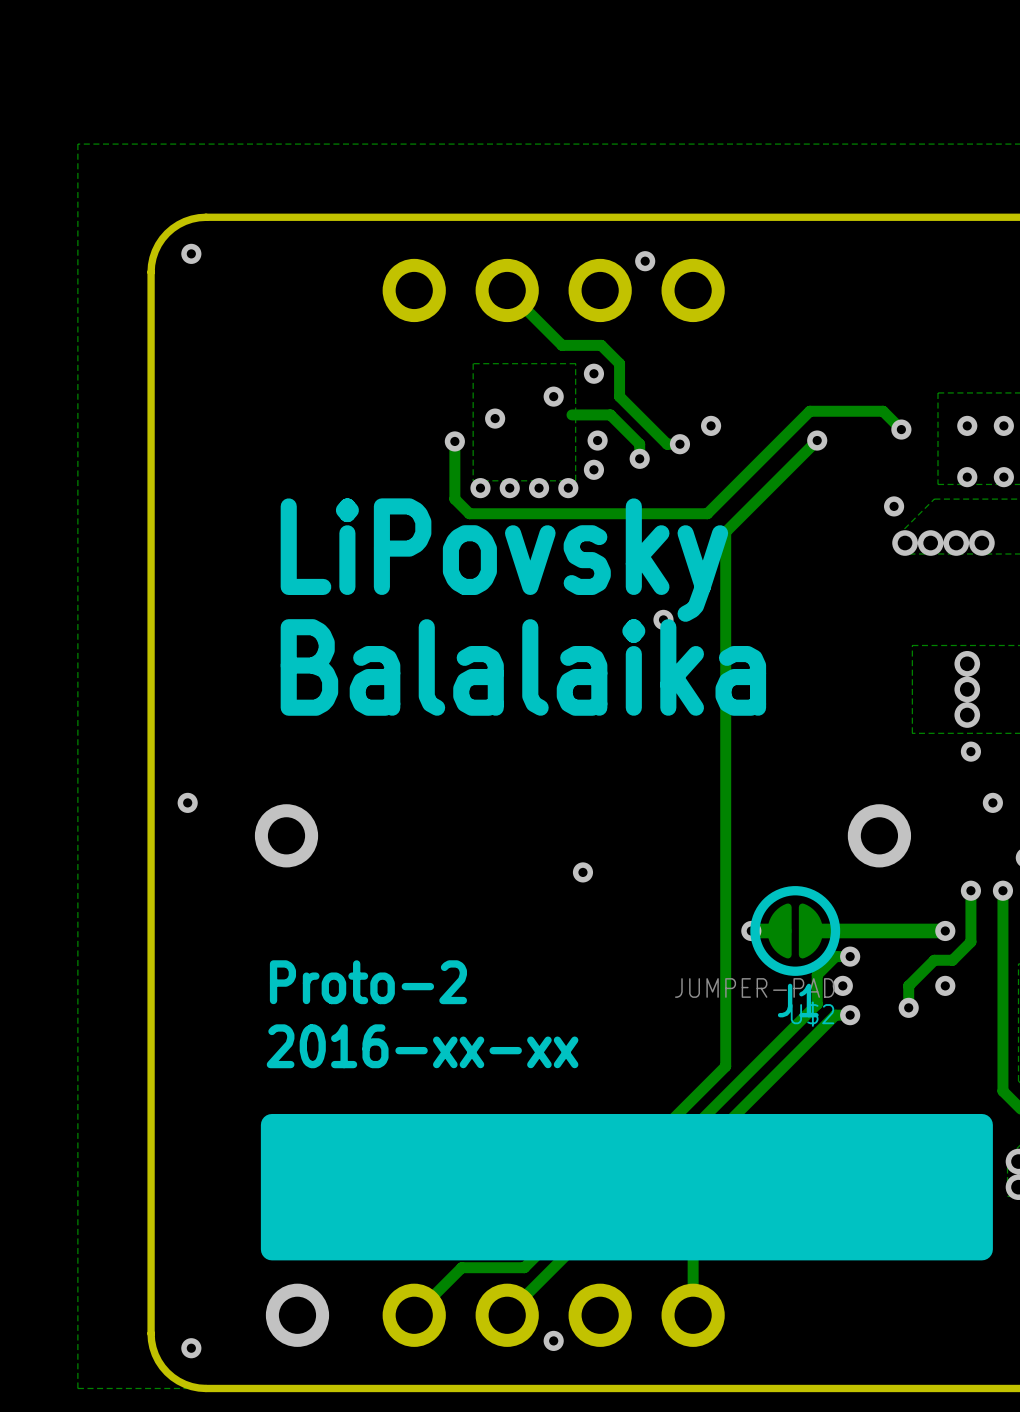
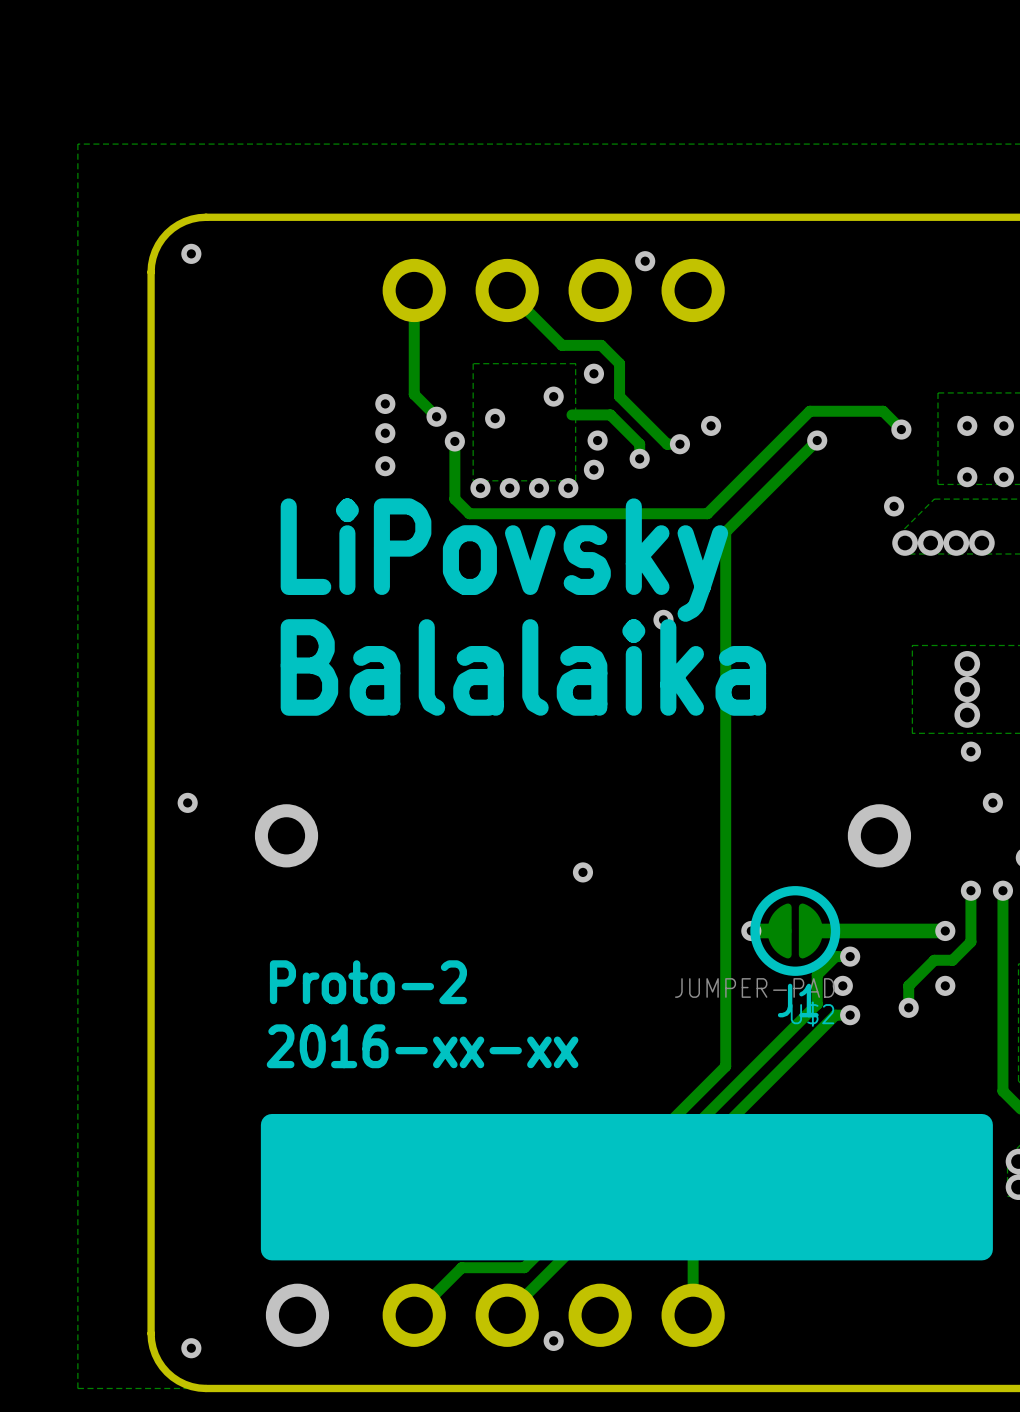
track: none -> (414, 290) (414, 394) (436, 416)
via: none -> (385, 403)
via: none -> (436, 416)
via: none -> (385, 433)
via: none -> (385, 466)

